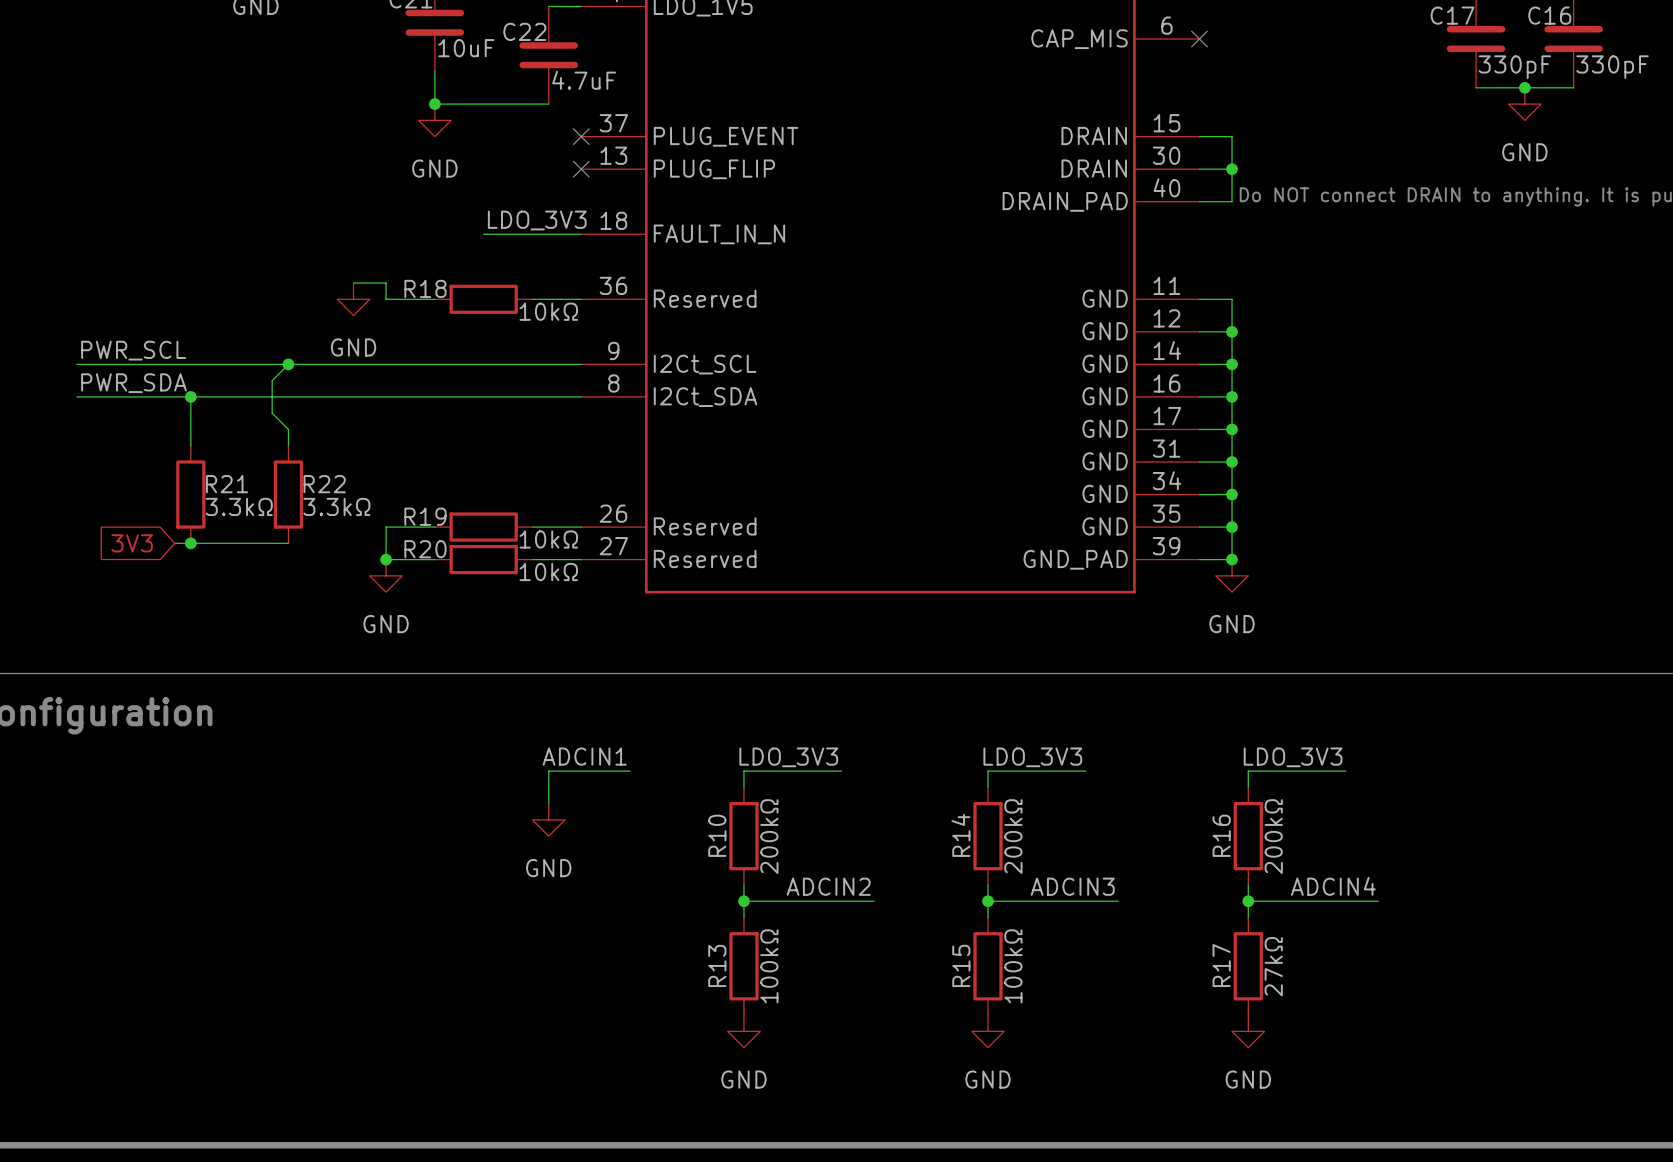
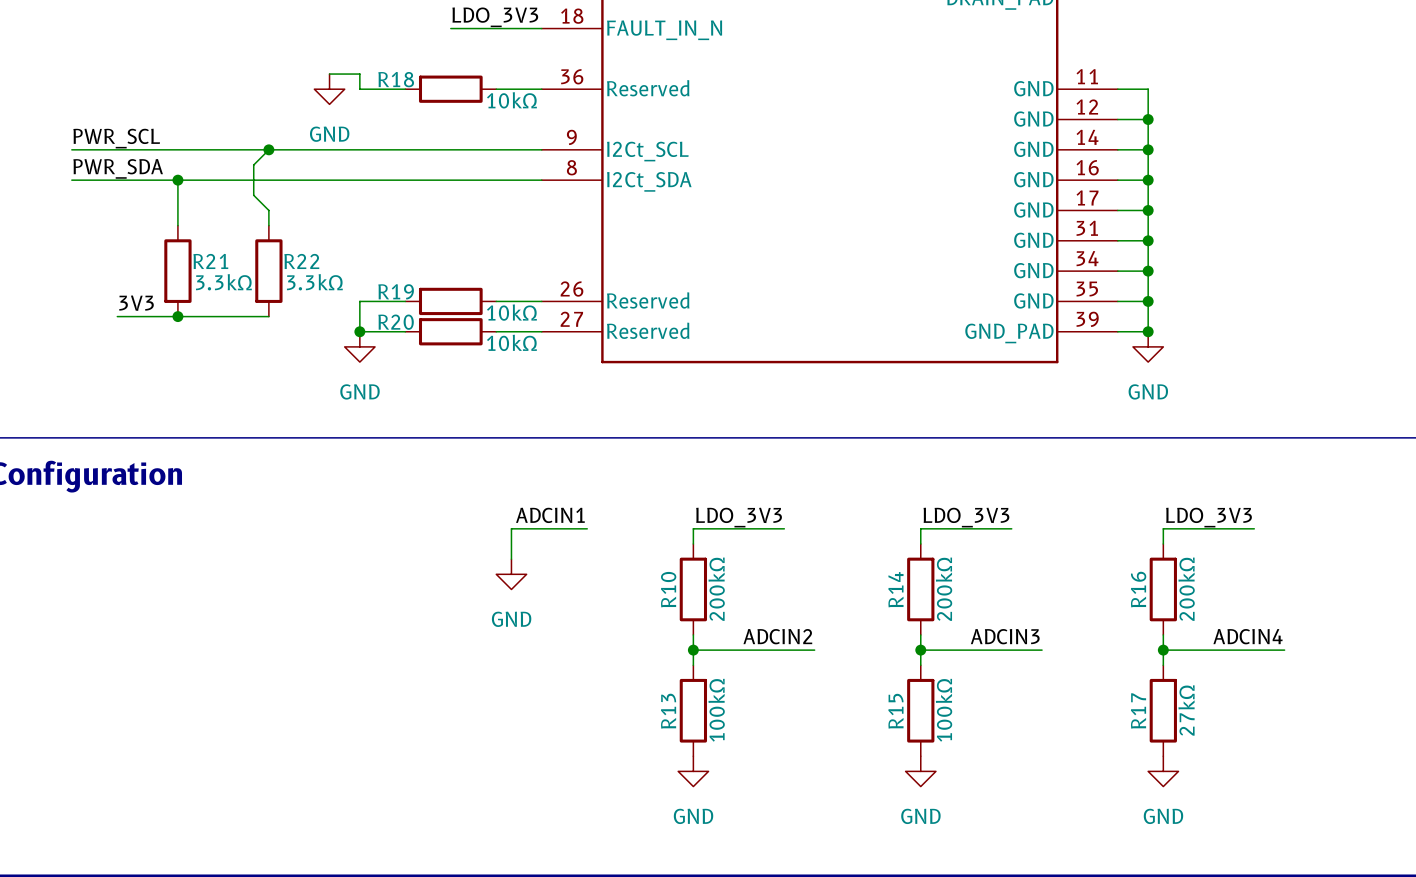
label: none -> 3V3 (136, 303)
wire: none -> (117, 316) (162, 316)
global label: 3V3 (132, 543) -> none

